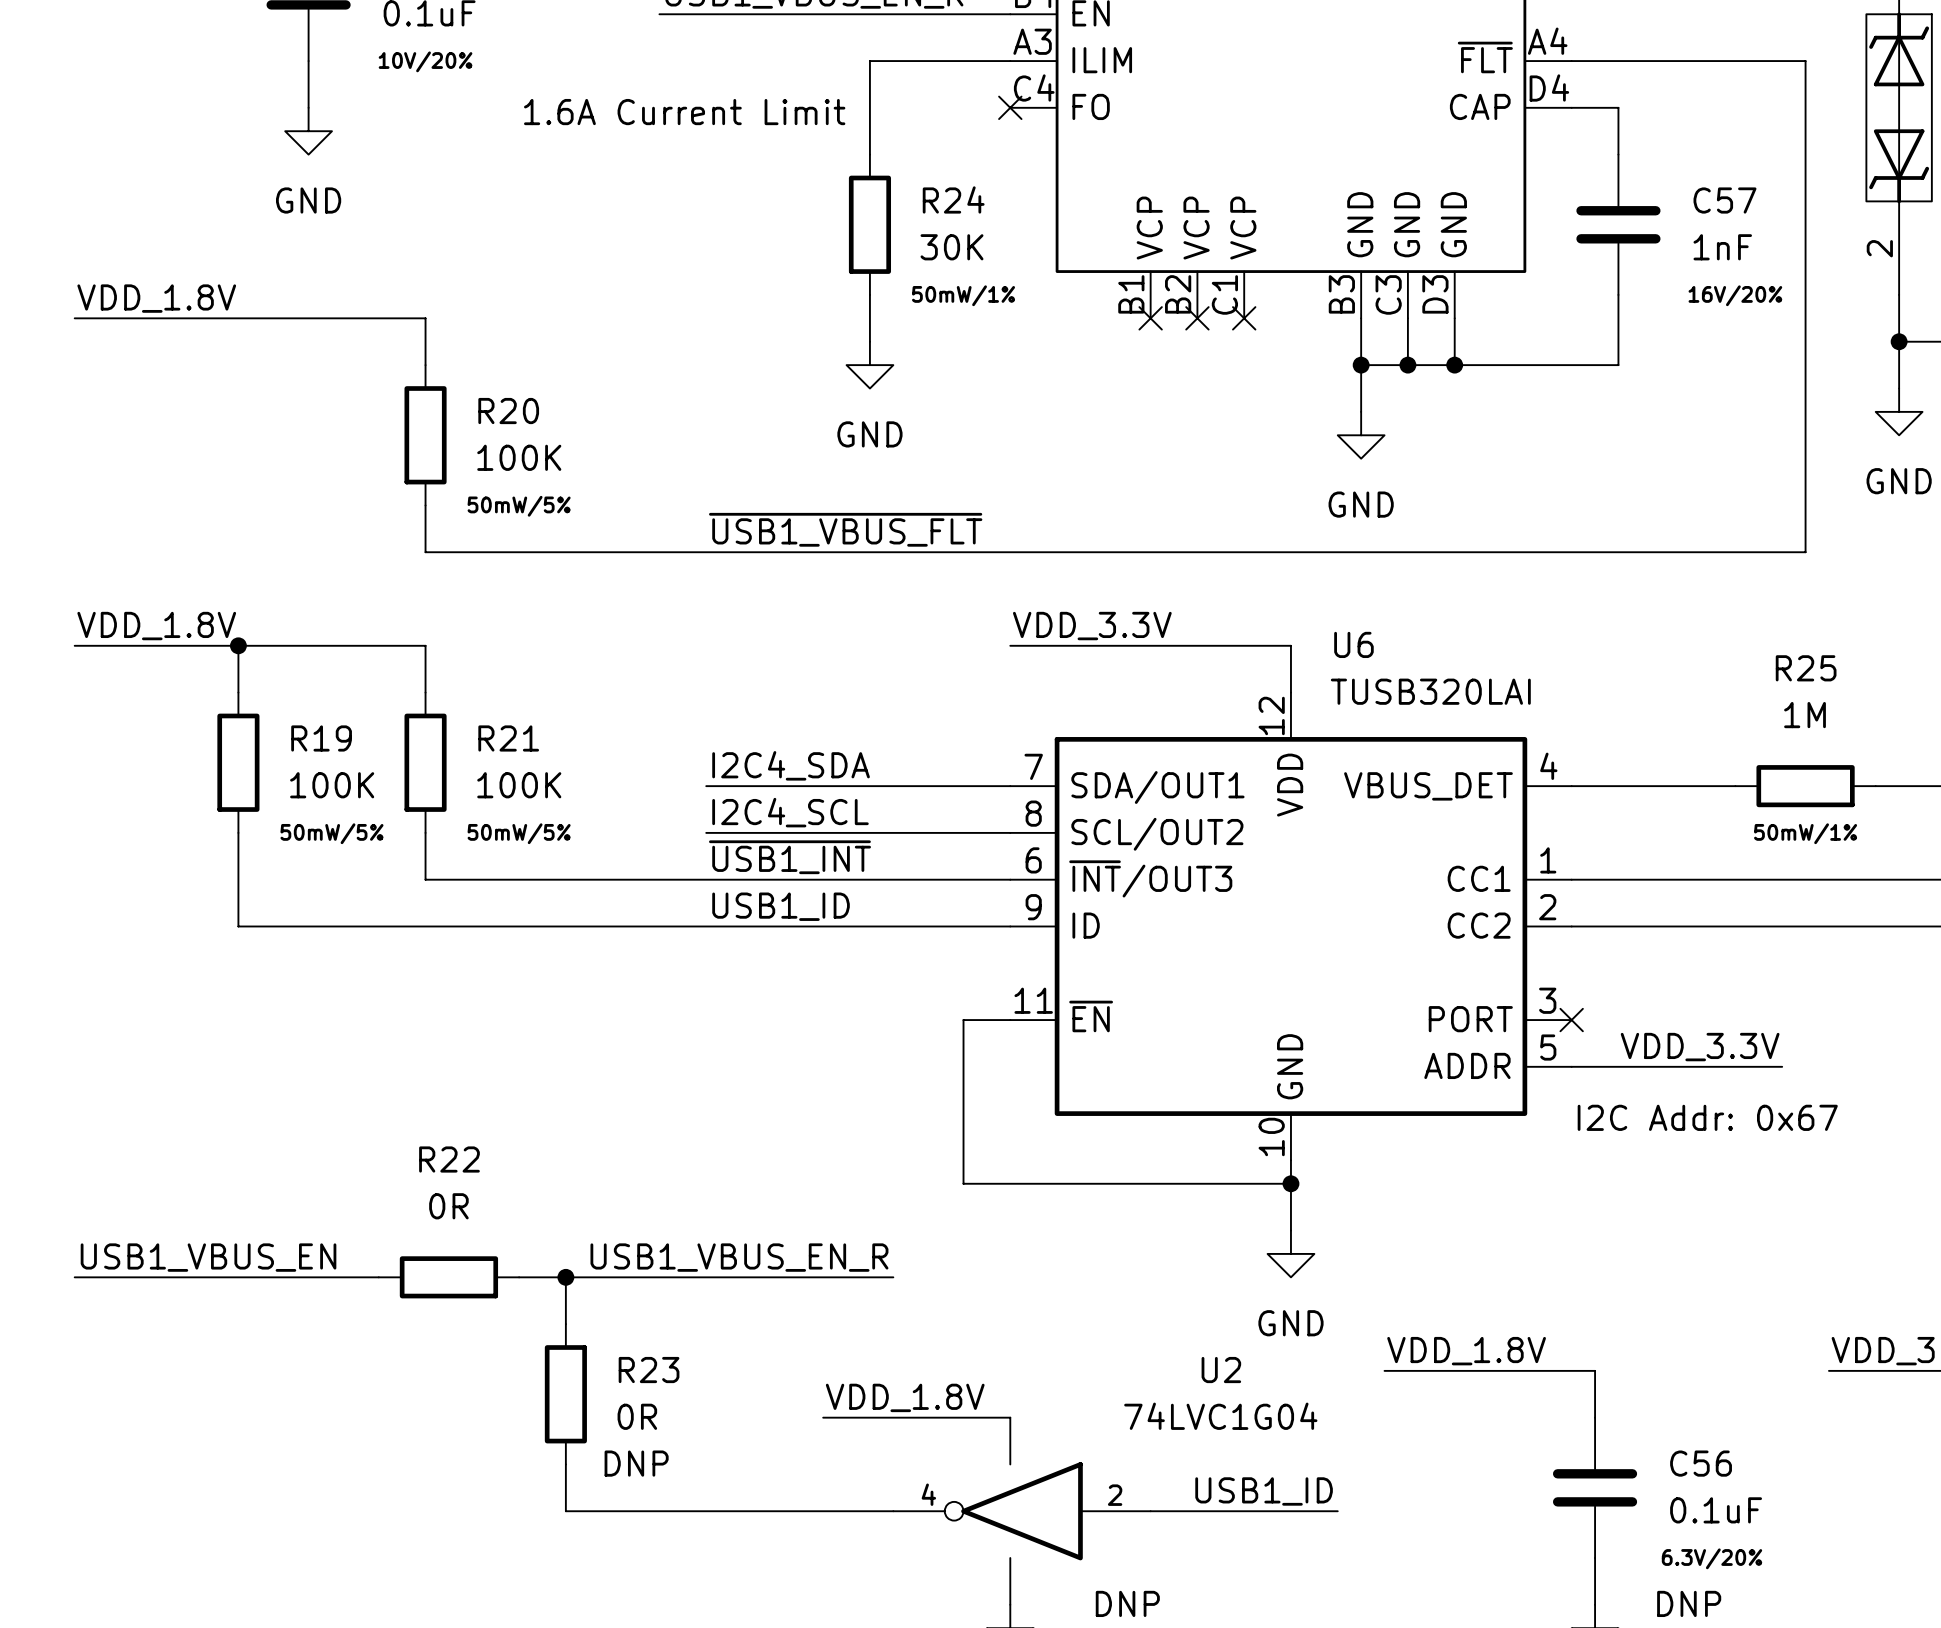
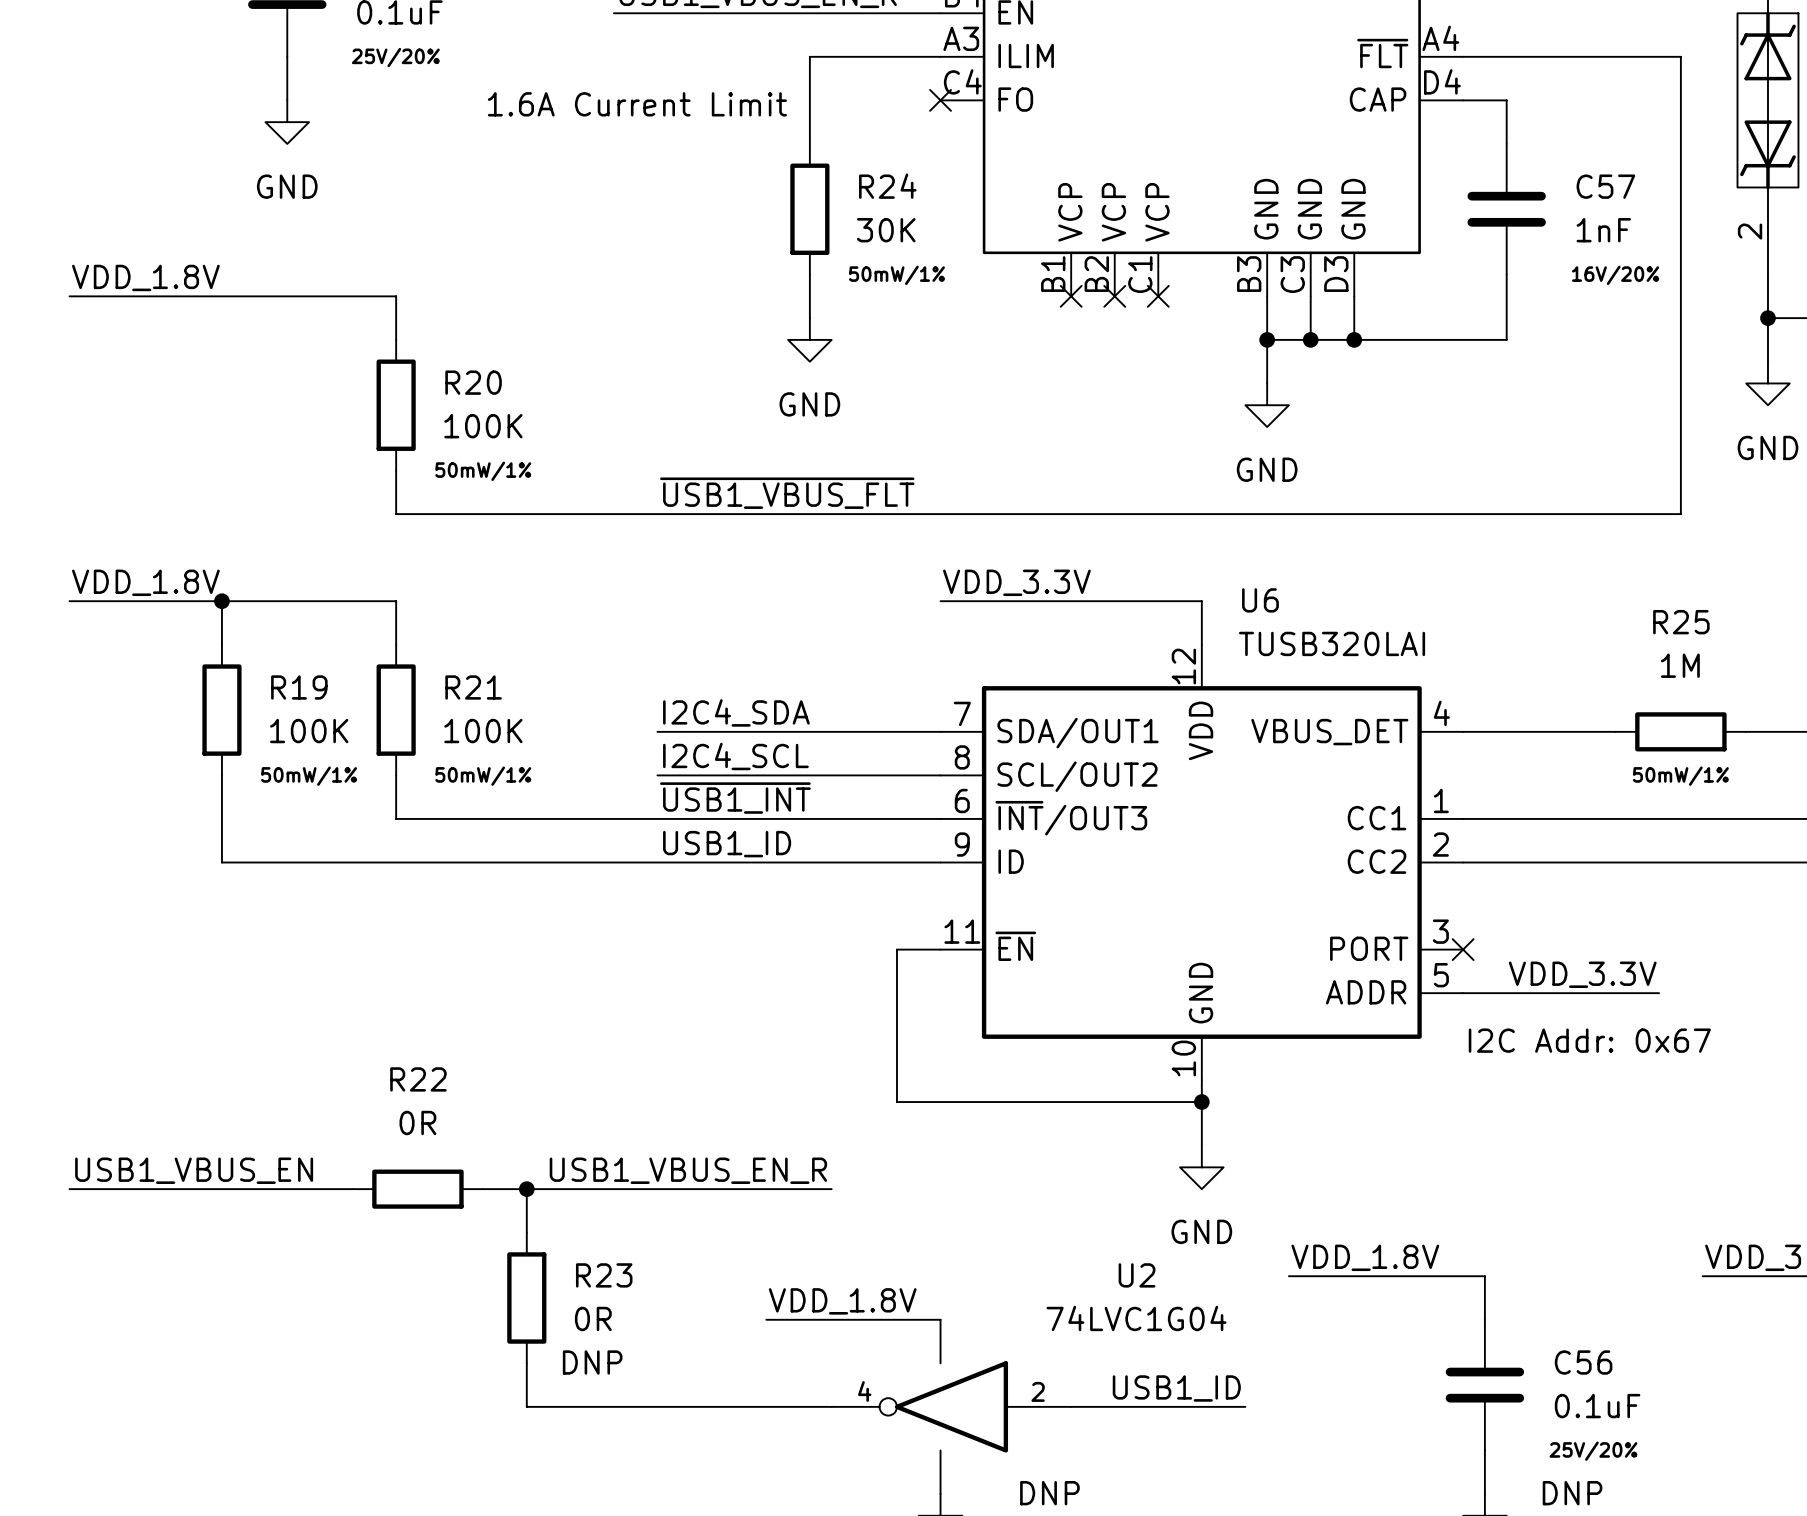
part text: 10V/20% (425, 61) -> 25V/20% (395, 57)
R20 text: 50mW/5% (519, 506) -> 50mW/1% (483, 471)
R19 text: 50mW/5% (331, 833) -> 50mW/1% (309, 776)
R21 text: 50mW/5% (519, 833) -> 50mW/1% (483, 776)
C56 text: 6.3V/20% (1712, 1558) -> 25V/20% (1593, 1451)

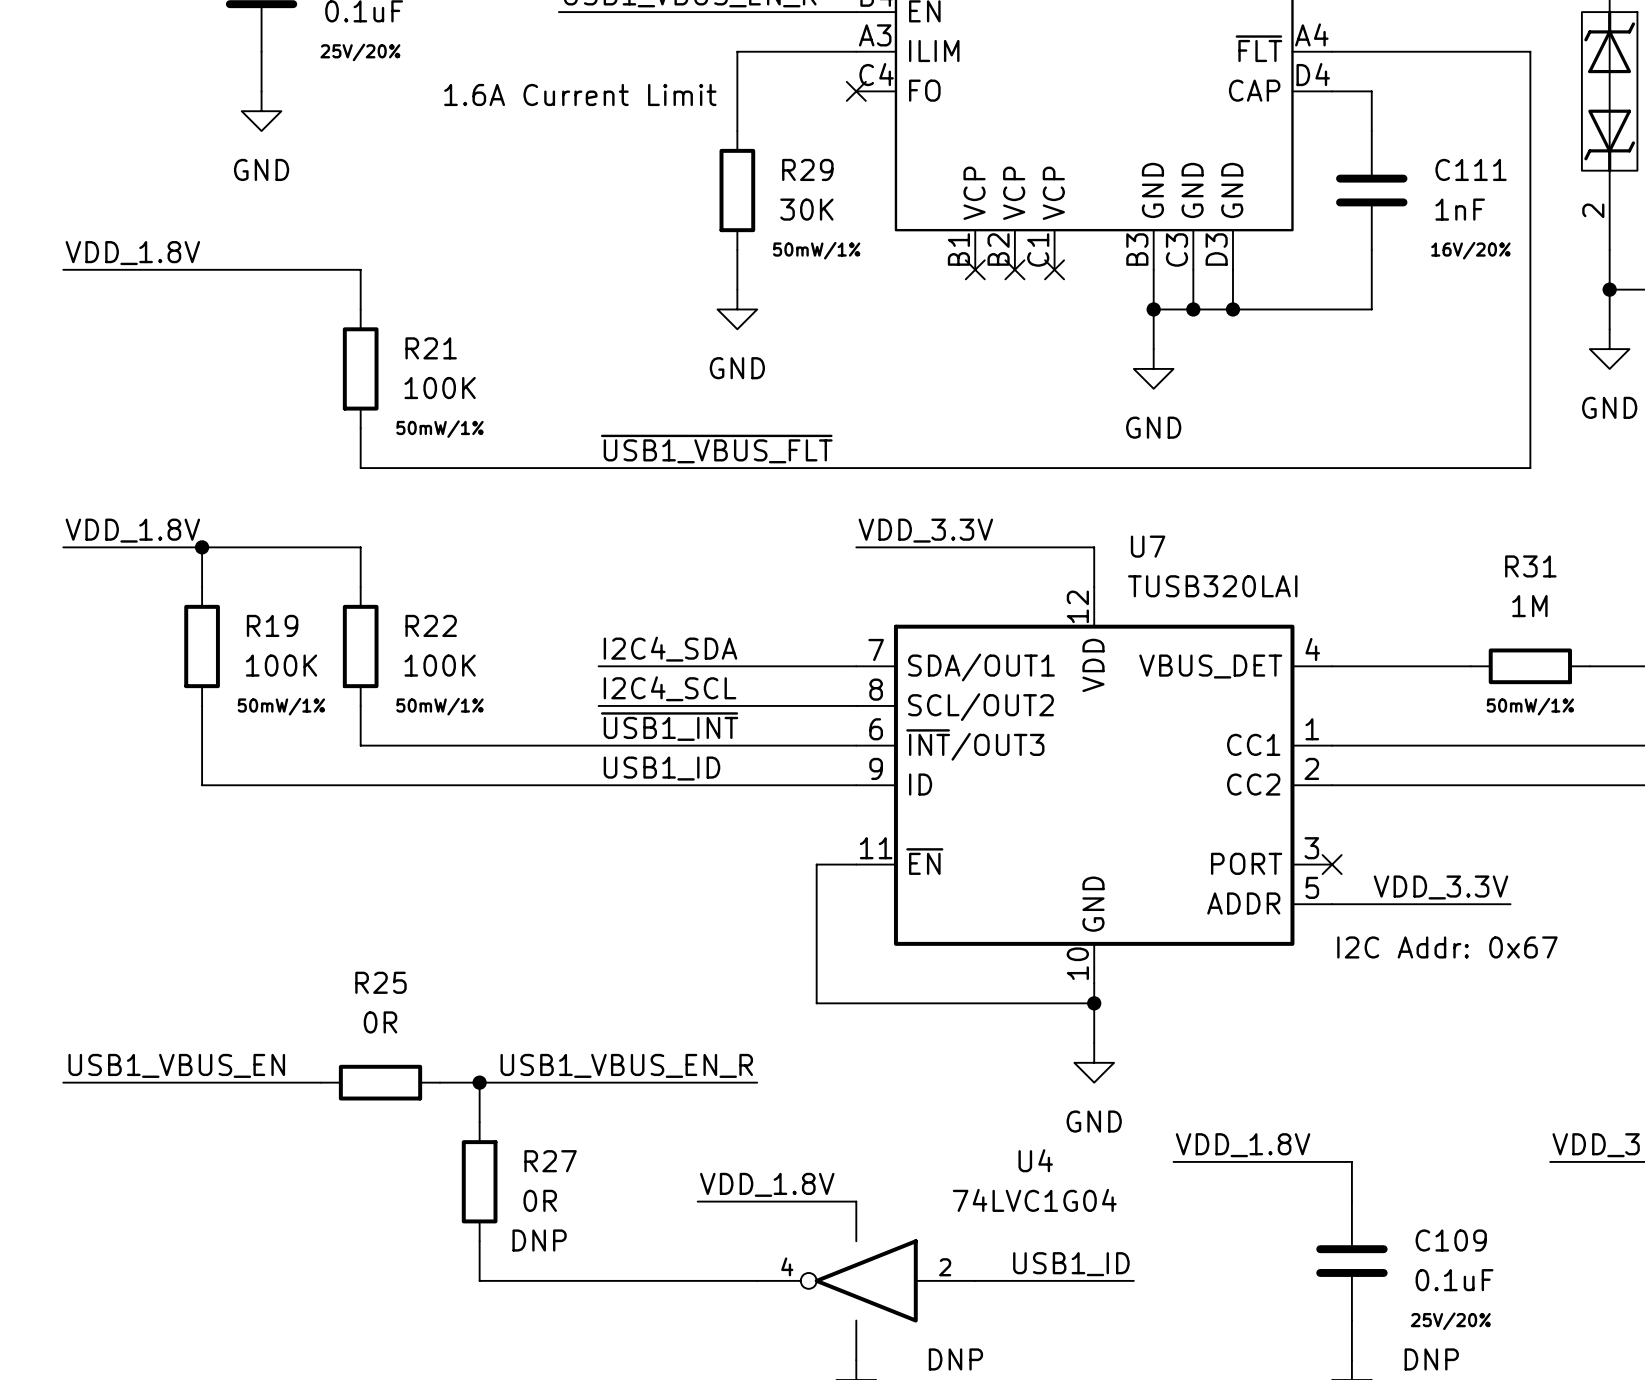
R24 name: R24 (887, 186) -> R29 (807, 169)
C57 name: C57 (1605, 186) -> C111 (1471, 169)
R20 name: R20 (473, 382) -> R21 (431, 348)
U6 name: U6 (1260, 600) -> U7 (1148, 546)
R25 name: R25 (1681, 622) -> R31 (1530, 566)
R21 name: R21 (473, 687) -> R22 (431, 625)
R22 name: R22 (418, 1079) -> R25 (380, 982)
R23 name: R23 (604, 1275) -> R27 (550, 1161)
U2 name: U2 (1137, 1275) -> U4 (1035, 1160)
C56 name: C56 (1583, 1362) -> C109 (1451, 1240)

